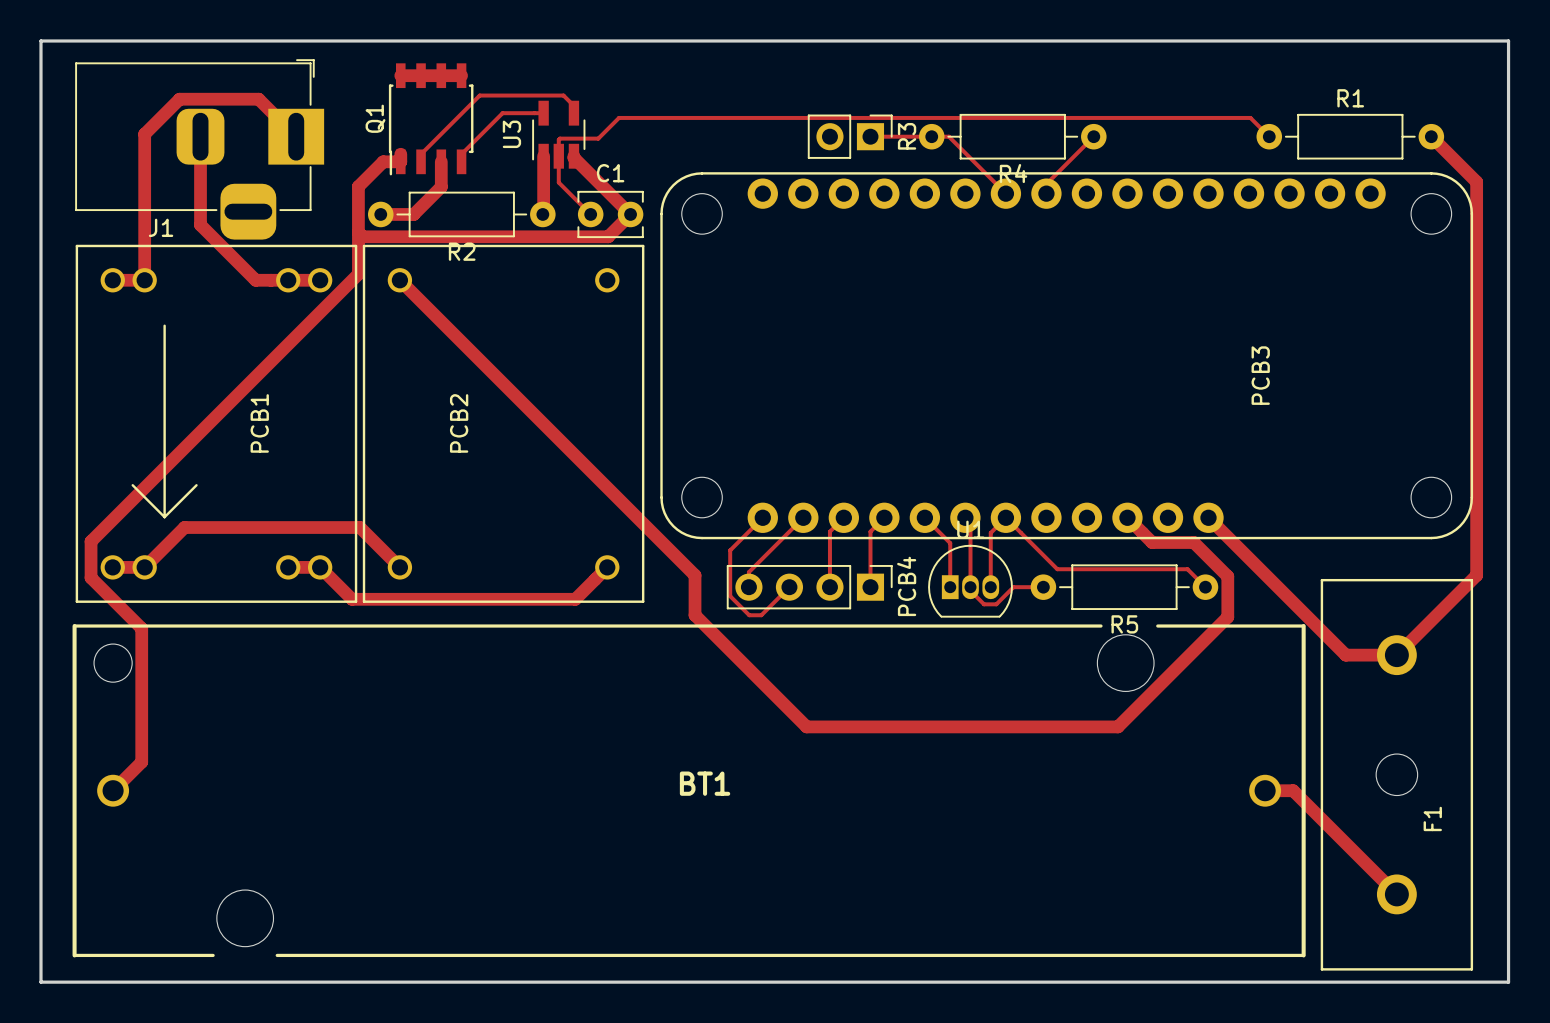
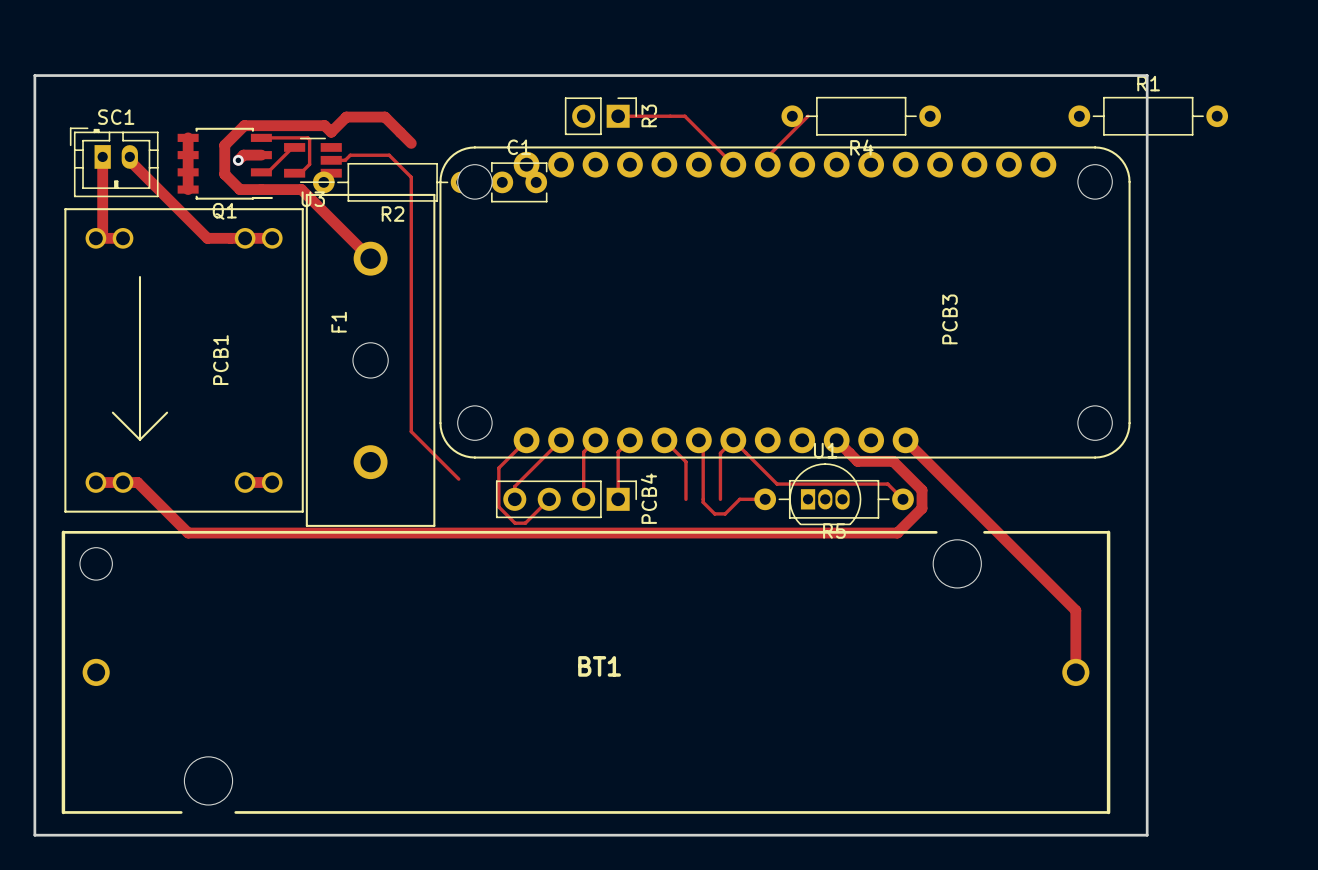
track: (400, 75) (461, 75) -> none
board edge: (40, 88) (40, 40) (1508, 40) (1508, 982) (1349, 982) -> (34, 75) (1147, 75) (1147, 835)
track: (543, 113) (502, 113) (461, 154) (461, 161) -> none
track: (573, 113) (573, 105) (563, 95) (479, 95) (421, 154) (421, 161) -> none
Q1 rotation: 0° (431, 119) -> 90° counterclockwise (225, 163)
Q1 position: (431, 119) -> (225, 163)
U3 rotation: 0° (558, 134) -> 90° counterclockwise (312, 160)
U3 position: (558, 134) -> (312, 160)
track: (200, 136) (200, 225) (255, 280) -> (129, 156) (129, 160) (207, 238) (217, 238)
track: (296, 136) (258, 99) (179, 99) (144, 134) (144, 280) -> none
R3 position: (850, 136) -> (600, 116)
track: (870, 136) (948, 136) (1005, 193) -> (618, 116) (684, 116) (733, 164)
track: (1093, 136) (1046, 184) (1046, 193) -> (808, 116) (767, 156) (767, 164)
track: (1269, 136) (1250, 117) (619, 117) (598, 138) (558, 139) (558, 182) (590, 214) -> none
track: (1431, 136) (1476, 182) (1476, 575) (1396, 655) (1345, 655) (1208, 517) -> none
J1: (199, 149) -> none
track: (400, 154) (400, 161) (383, 161) (358, 186) (358, 274) (91, 541) (91, 577) (141, 628) (141, 762) (113, 790) -> none
track: (543, 156) (542, 214) -> none
track: (573, 156) (630, 214) (608, 236) (362, 236) (358, 232) -> none
track: (441, 161) (441, 186) (413, 214) (380, 214) -> none
track: none -> (188, 137) (188, 189)
track: none -> (261, 137) (307, 137) (309, 139) (309, 164) (300, 173) (294, 173)
track: none -> (411, 143) (384, 117) (346, 117) (331, 132) (324, 125) (244, 125) (224, 145) (224, 174) (240, 189) (301, 189) (370, 258)
track: none -> (294, 147) (267, 172) (261, 172)
track: none -> (261, 155) (243, 155) (238, 160)
track: none -> (102, 156) (102, 231) (95, 238)
via: none -> (238, 160)
track: none -> (331, 160) (345, 160) (350, 155) (389, 155) (411, 177) (411, 431) (458, 479)
SC1: none -> (114, 162)
track: (399, 280) (695, 575) (695, 615) (806, 726) (1117, 726) (1227, 617) (1227, 576) (1193, 542) (1152, 542) (1127, 517) -> none
PCB3 position: (1066, 355) -> (785, 302)
PCB2: (503, 423) -> none
track: (762, 517) (730, 550) (730, 596) (749, 615) (761, 615) (789, 587) -> (526, 440) (498, 468) (498, 506) (515, 523) (525, 523) (549, 499)
track: (803, 517) (748, 572) (748, 587) -> (561, 440) (514, 486) (514, 499)
track: (843, 517) (829, 531) (829, 587) -> (595, 440) (583, 452) (583, 499)
track: (884, 517) (870, 531) (870, 587) -> (629, 440) (618, 452) (618, 499)
track: (924, 517) (950, 543) (950, 587) -> (664, 440) (685, 461) (685, 499)
track: (965, 517) (970, 522) (970, 590) (984, 604) (996, 604) (1013, 587) (1043, 587) -> (698, 440) (703, 444) (703, 502) (714, 513) (725, 513) (739, 499) (765, 499)
track: (144, 567) (184, 527) (360, 527) (399, 567) -> (123, 482) (137, 482) (188, 533) (897, 533) (922, 508) (922, 490) (893, 461) (857, 461) (836, 440)
track: (320, 567) (352, 599) (575, 599) (607, 567) -> none
PCB4 position: (809, 587) -> (566, 499)
track: (990, 587) (990, 532) (1005, 517) (1057, 569) (1187, 569) (1205, 587) -> (720, 499) (720, 453) (733, 440) (777, 484) (887, 484) (903, 499)
R5 position: (1124, 587) -> (834, 499)
F1 position: (1396, 774) -> (370, 360)
track: (1265, 790) (1293, 790) (1396, 894) -> (1075, 672) (1075, 610) (905, 440)
F1 name position: F1 (1432, 818) -> F1 (339, 322)

